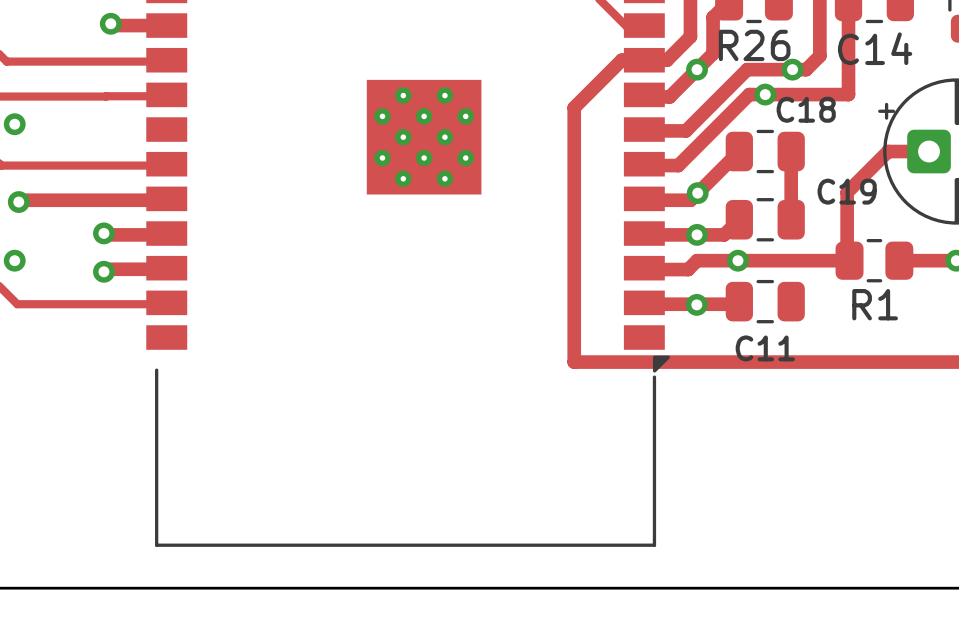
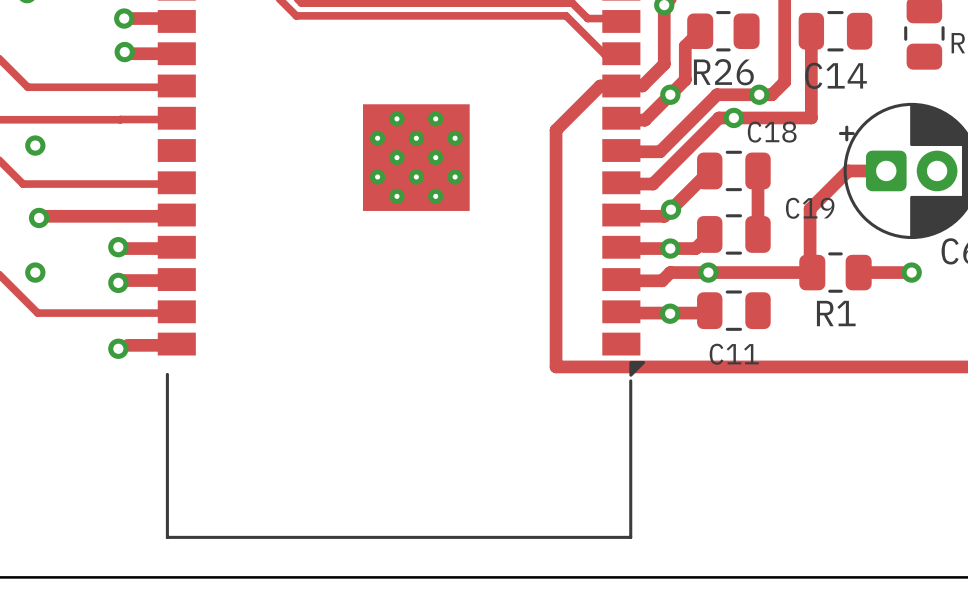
track: none -> (127, 345) (176, 345)
via: none -> (118, 348)

